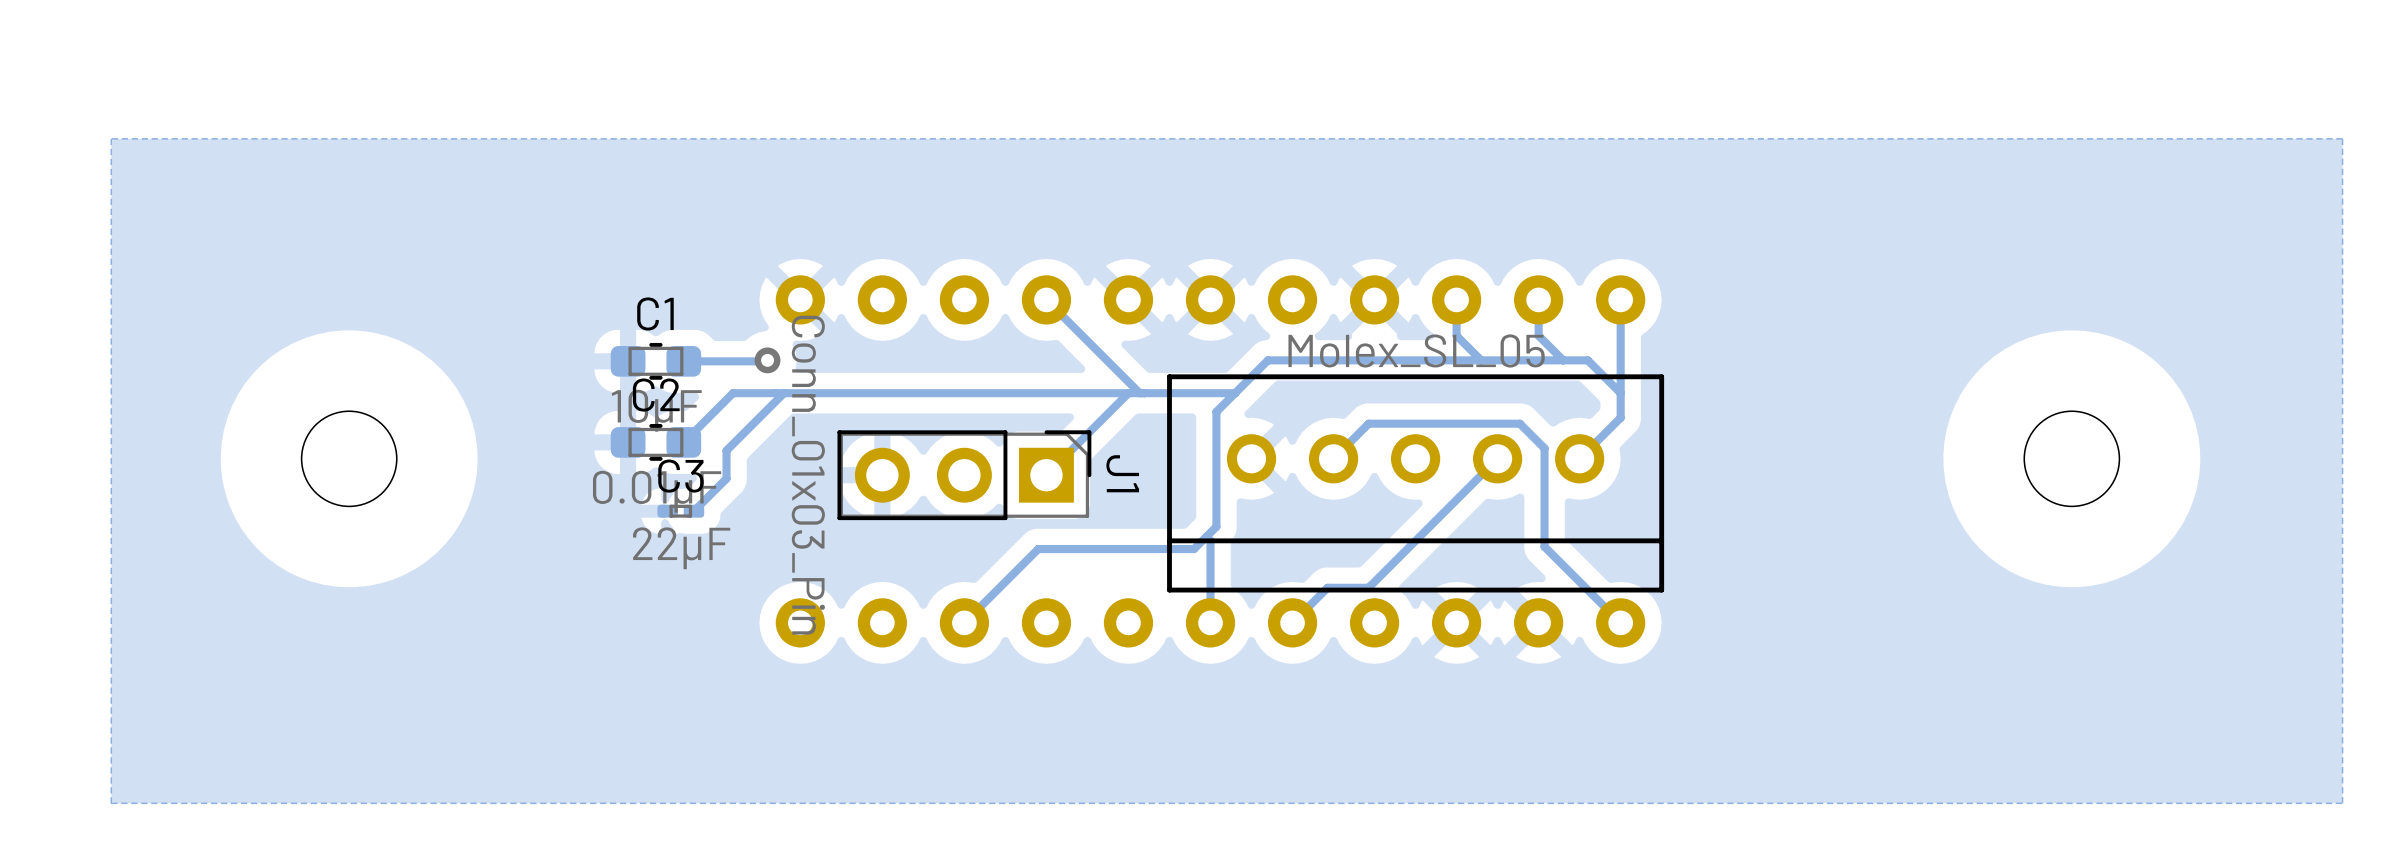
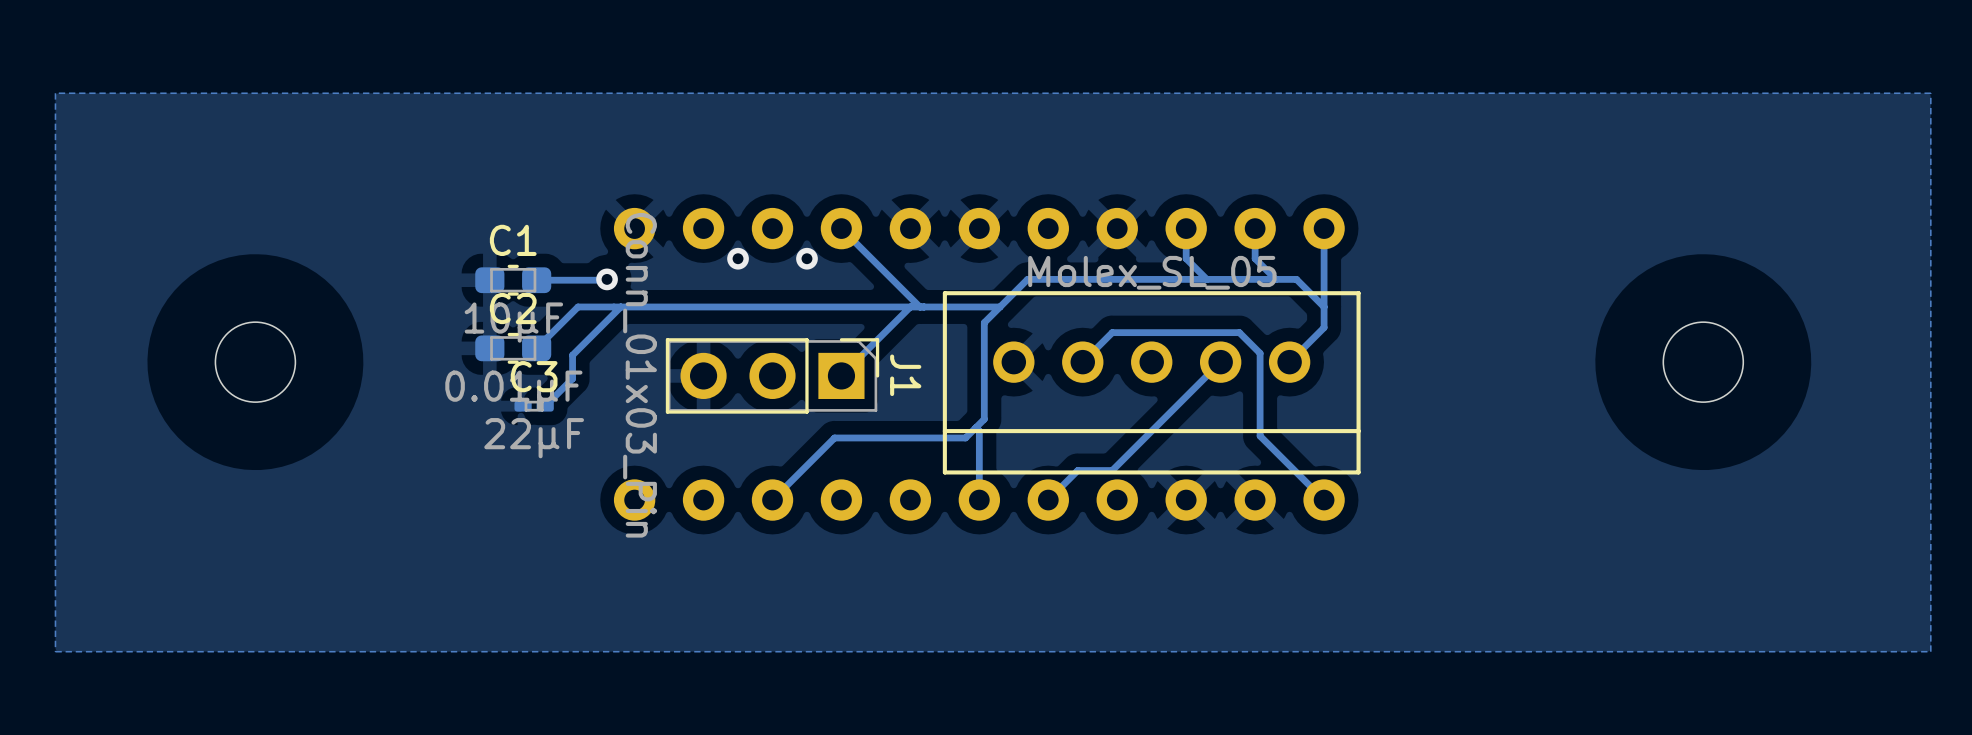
via: none -> (738, 258)
via: none -> (806, 258)

